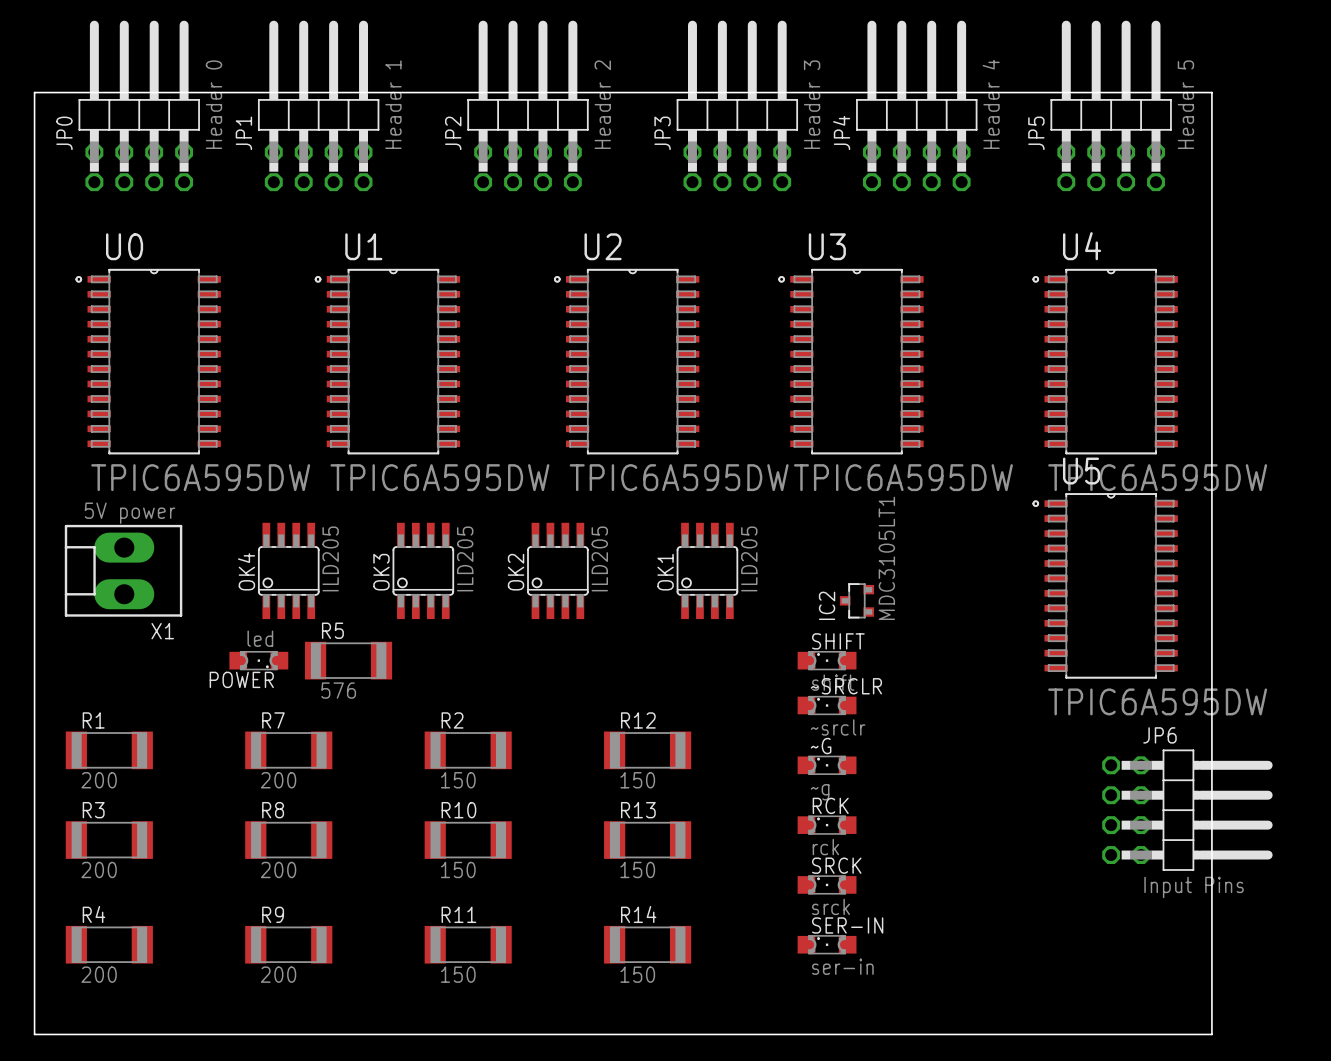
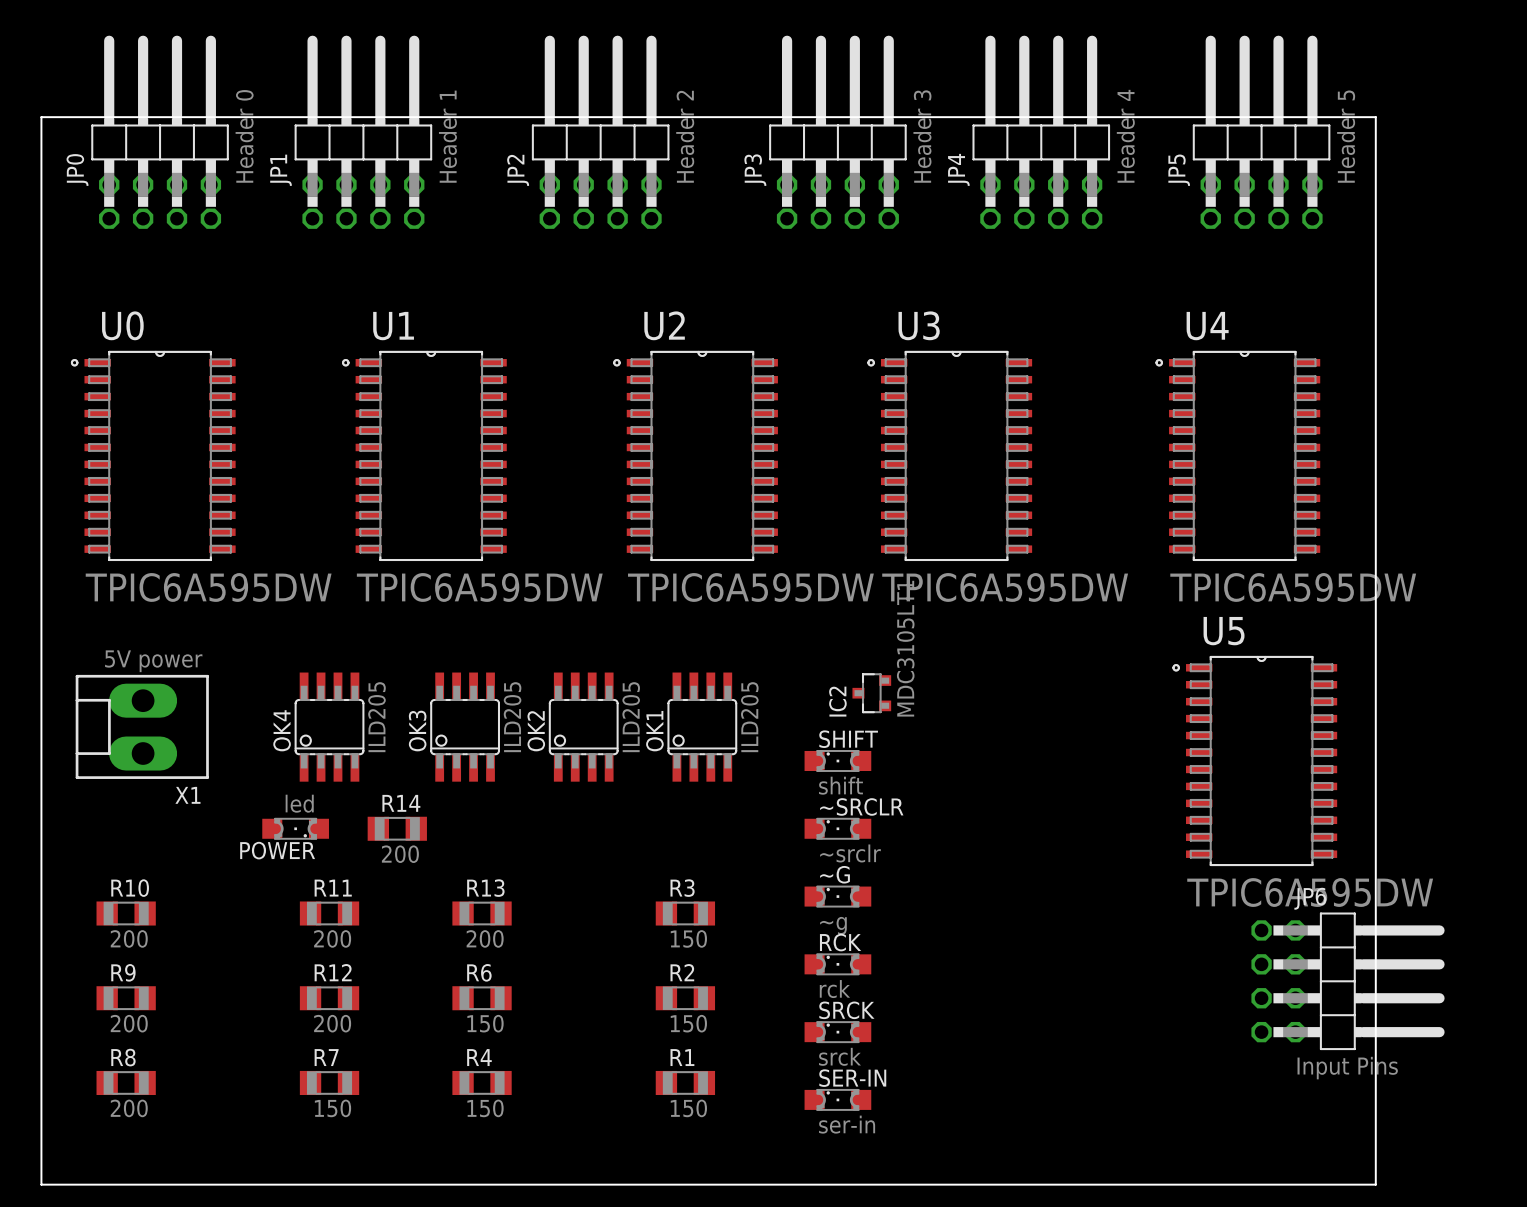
U0 position: (148, 361) -> (153, 455)
U1 position: (387, 361) -> (424, 455)
U2 position: (626, 361) -> (695, 455)
U3 position: (850, 361) -> (949, 455)
U4 position: (1105, 361) -> (1237, 455)
X1 position: (123, 570) -> (142, 726)
OK4 position: (288, 570) -> (329, 727)
OK3 position: (423, 570) -> (465, 727)
OK2 position: (557, 570) -> (583, 727)
OK1 position: (707, 570) -> (702, 727)
U5 position: (1105, 585) -> (1254, 760)
IC2 position: (856, 600) -> (871, 693)
POWER position: (258, 660) -> (295, 828)
R5: 576 (348, 660) -> none
SHIFT position: (827, 660) -> (837, 760)
~SRCLR position: (827, 705) -> (837, 828)
R1 footprint: [65, 731, 153, 770] -> [655, 1070, 716, 1096]
R7 footprint: [245, 731, 333, 770] -> [299, 1070, 360, 1096]
R2 footprint: [424, 731, 512, 770] -> [655, 986, 716, 1011]
R12 footprint: [604, 731, 692, 770] -> [299, 986, 360, 1011]
~G position: (827, 765) -> (837, 896)
R1 value: 200 (99, 780) -> 150 (688, 1108)
R7 value: 200 (278, 780) -> 150 (332, 1108)
R12 value: 150 (637, 780) -> 200 (332, 1023)
JP6 position: (1187, 810) -> (1348, 981)
R3 footprint: [65, 821, 153, 859] -> [655, 901, 716, 926]
R8 footprint: [245, 821, 333, 859] -> [96, 1070, 156, 1096]
R10 footprint: [424, 821, 512, 859] -> [96, 901, 156, 926]
R13 footprint: [604, 821, 692, 859] -> [452, 901, 512, 926]
RCK position: (827, 825) -> (837, 964)
R3 value: 200 (99, 869) -> 150 (688, 938)
R6: none -> 150 (482, 998)
R10 value: 150 (458, 869) -> 200 (129, 938)
R13 value: 150 (637, 869) -> 200 (485, 938)
SRCK position: (827, 884) -> (837, 1032)
R4 footprint: [65, 925, 153, 964] -> [452, 1070, 512, 1096]
R9 footprint: [245, 925, 333, 964] -> [96, 986, 156, 1011]
R11 footprint: [424, 925, 512, 964] -> [299, 901, 360, 926]
R14 footprint: [604, 925, 692, 964] -> [367, 816, 427, 841]
SER-IN position: (827, 944) -> (837, 1099)
R4 value: 200 (99, 974) -> 150 (485, 1108)
R11 value: 150 (458, 974) -> 200 (332, 938)
R14 value: 150 (637, 974) -> 200 (400, 854)

